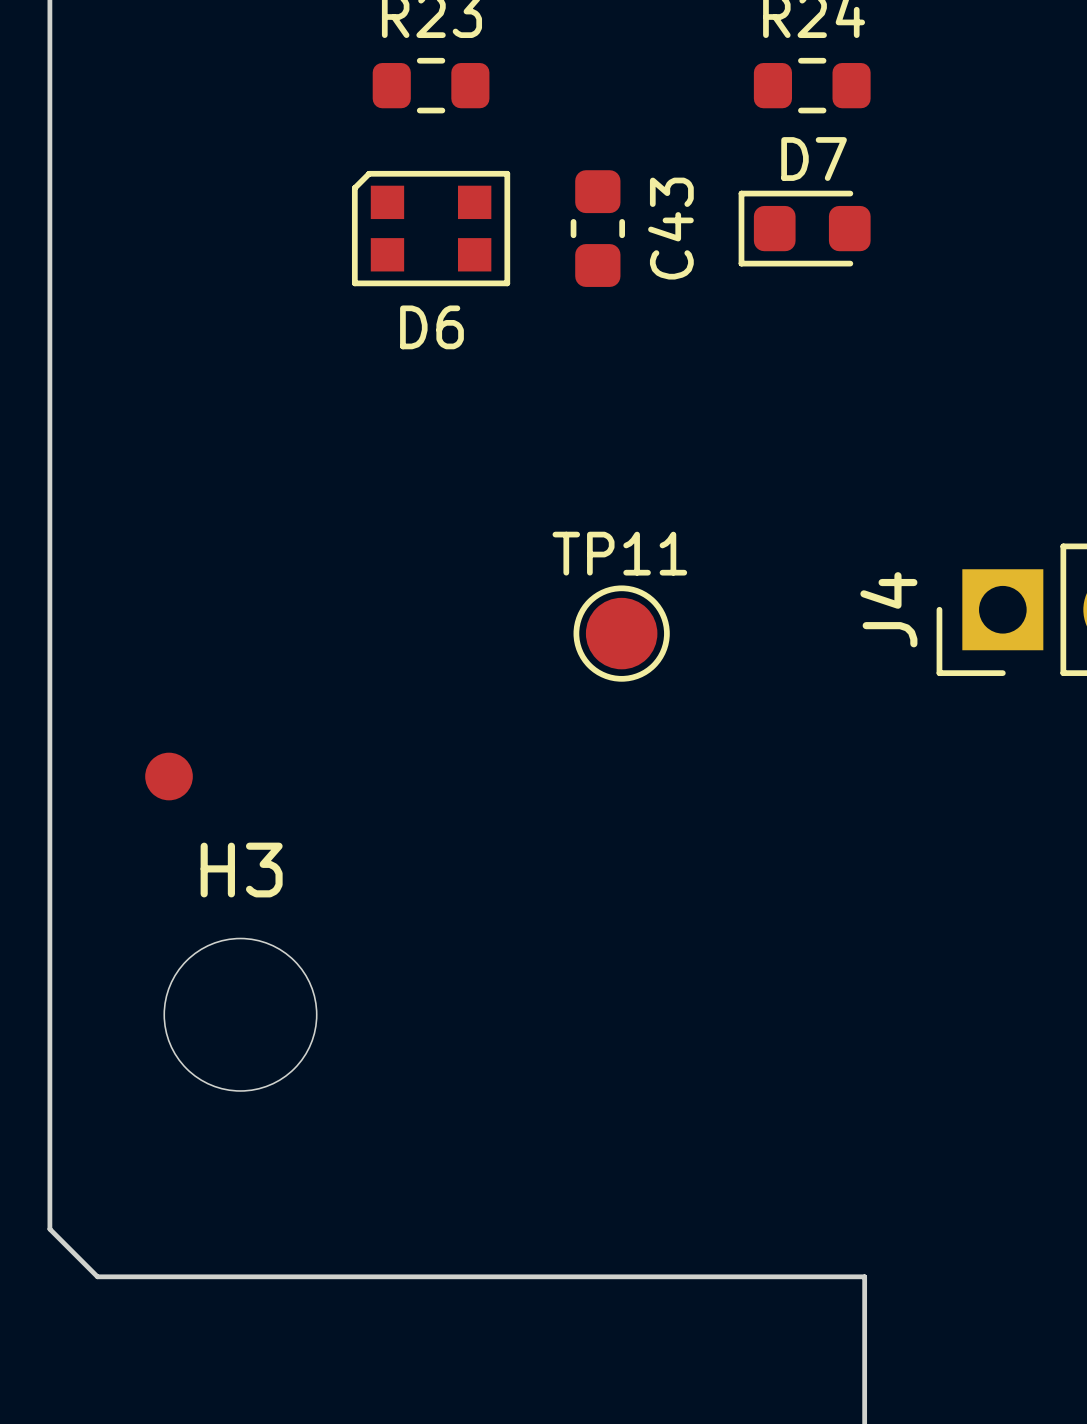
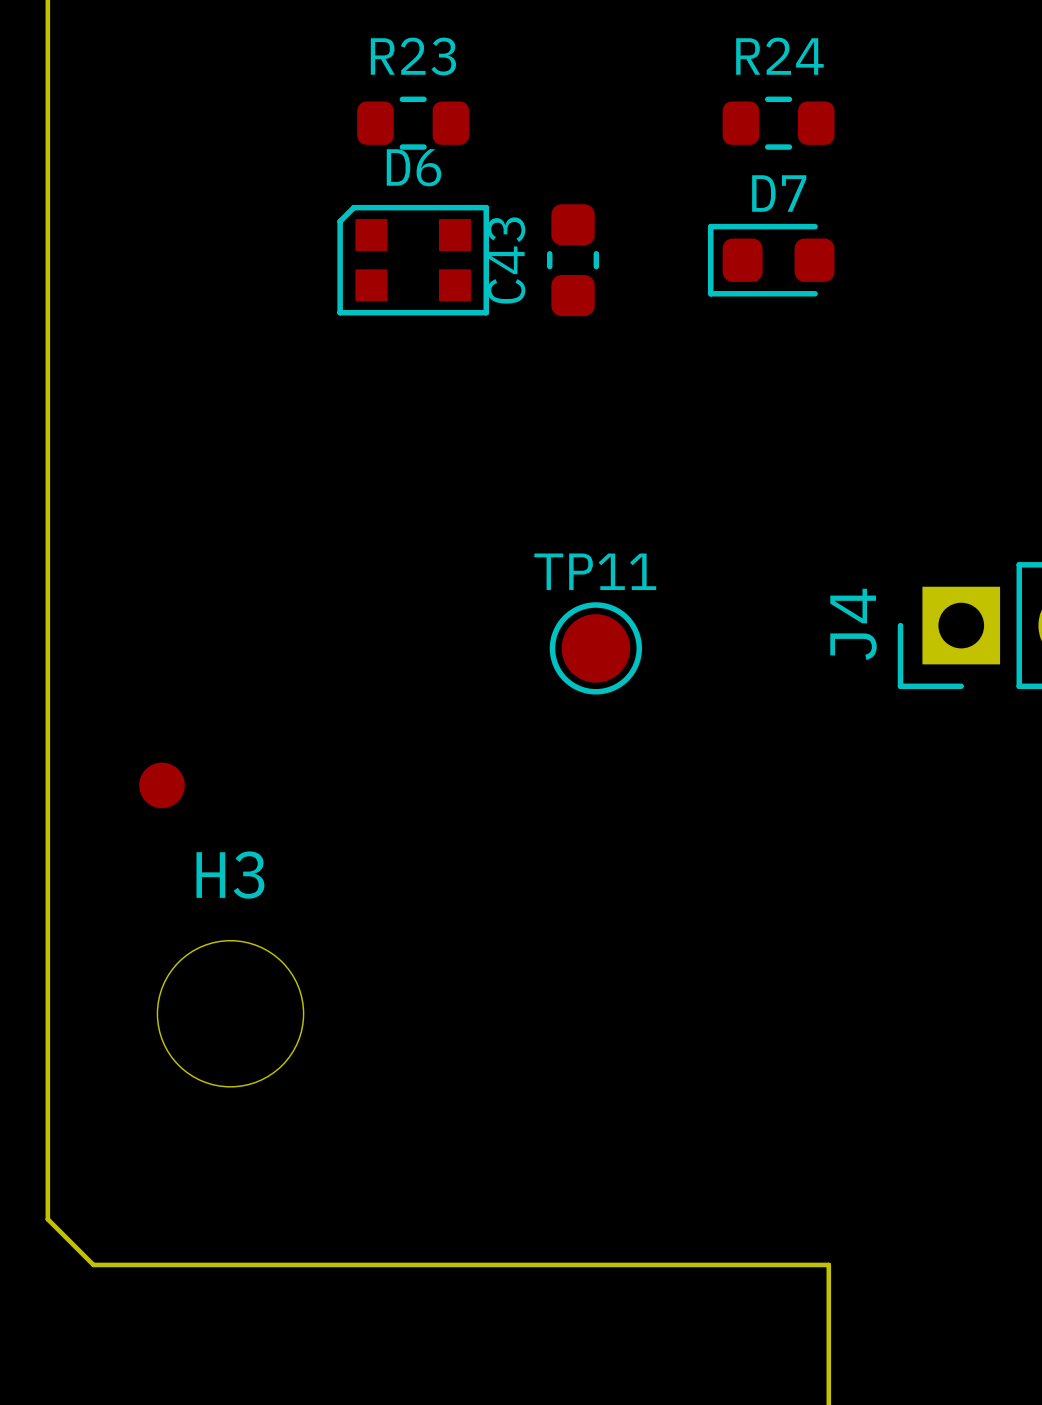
C43 name position: C43 (670, 228) -> C43 (506, 260)
D6 name position: D6 (431, 327) -> D6 (414, 167)

